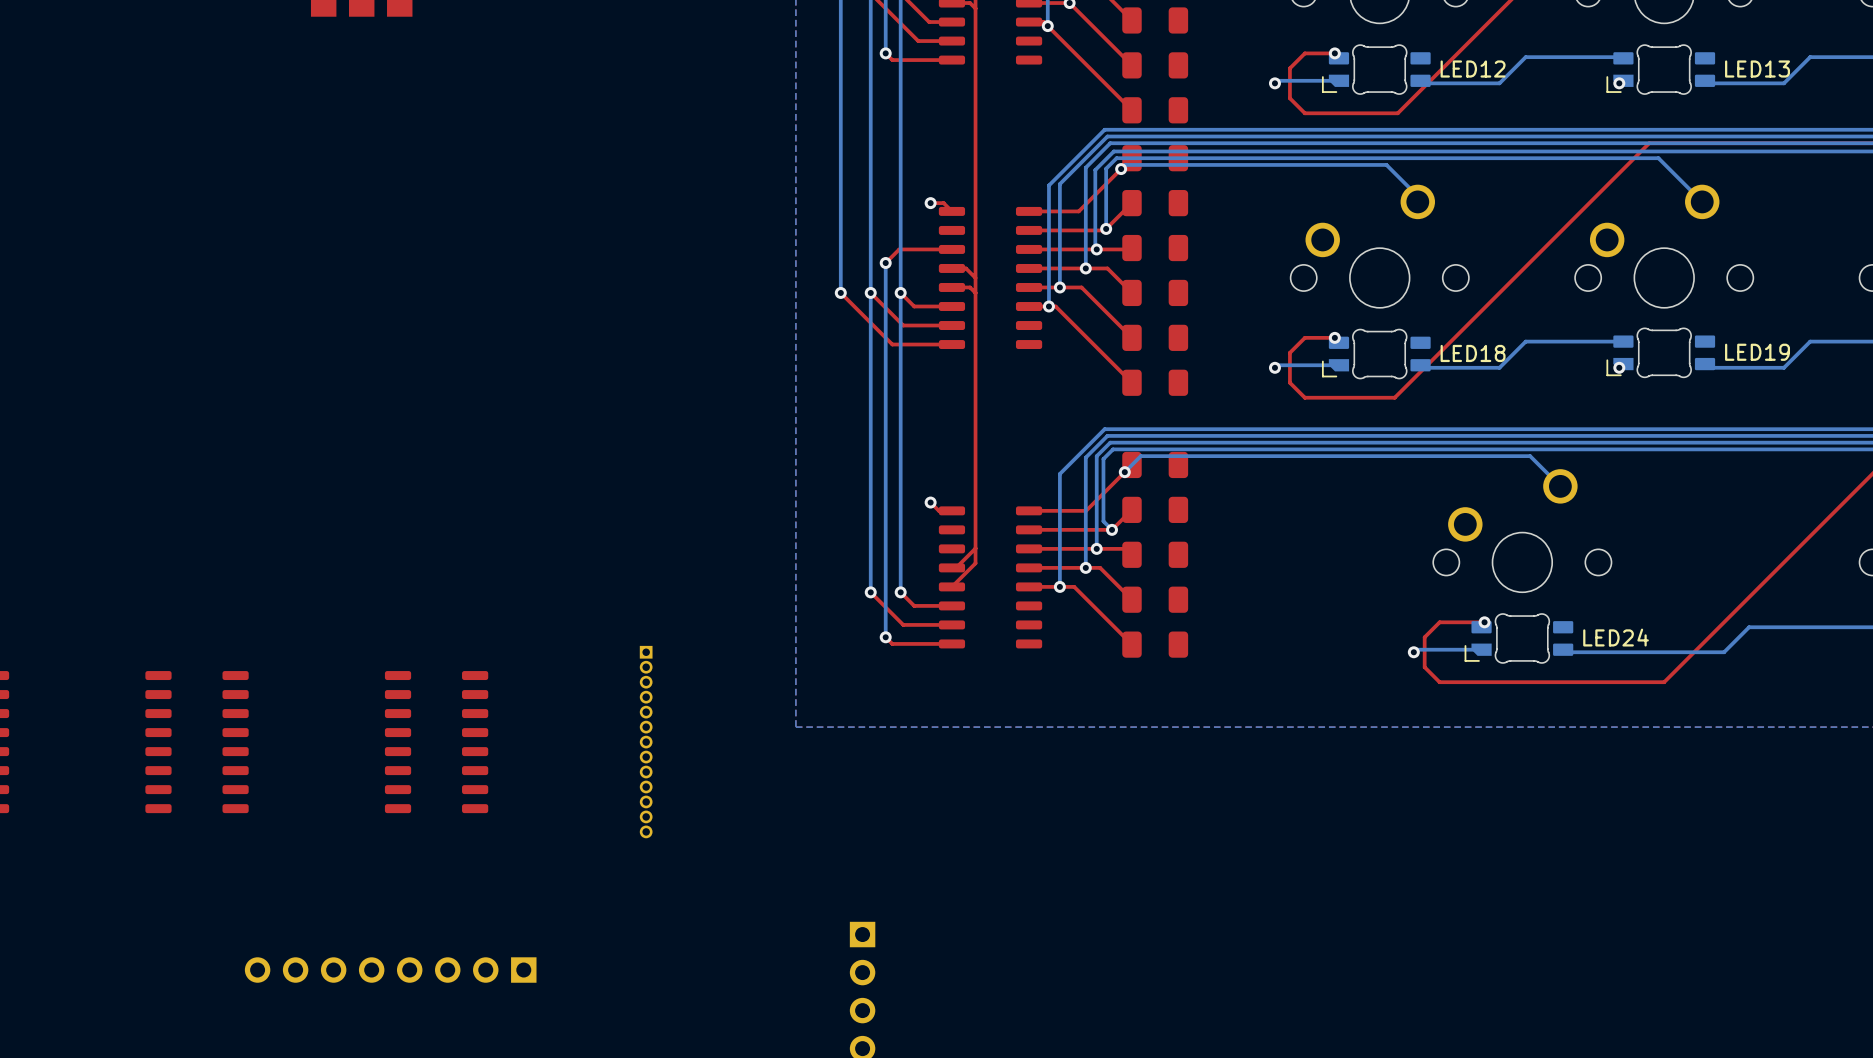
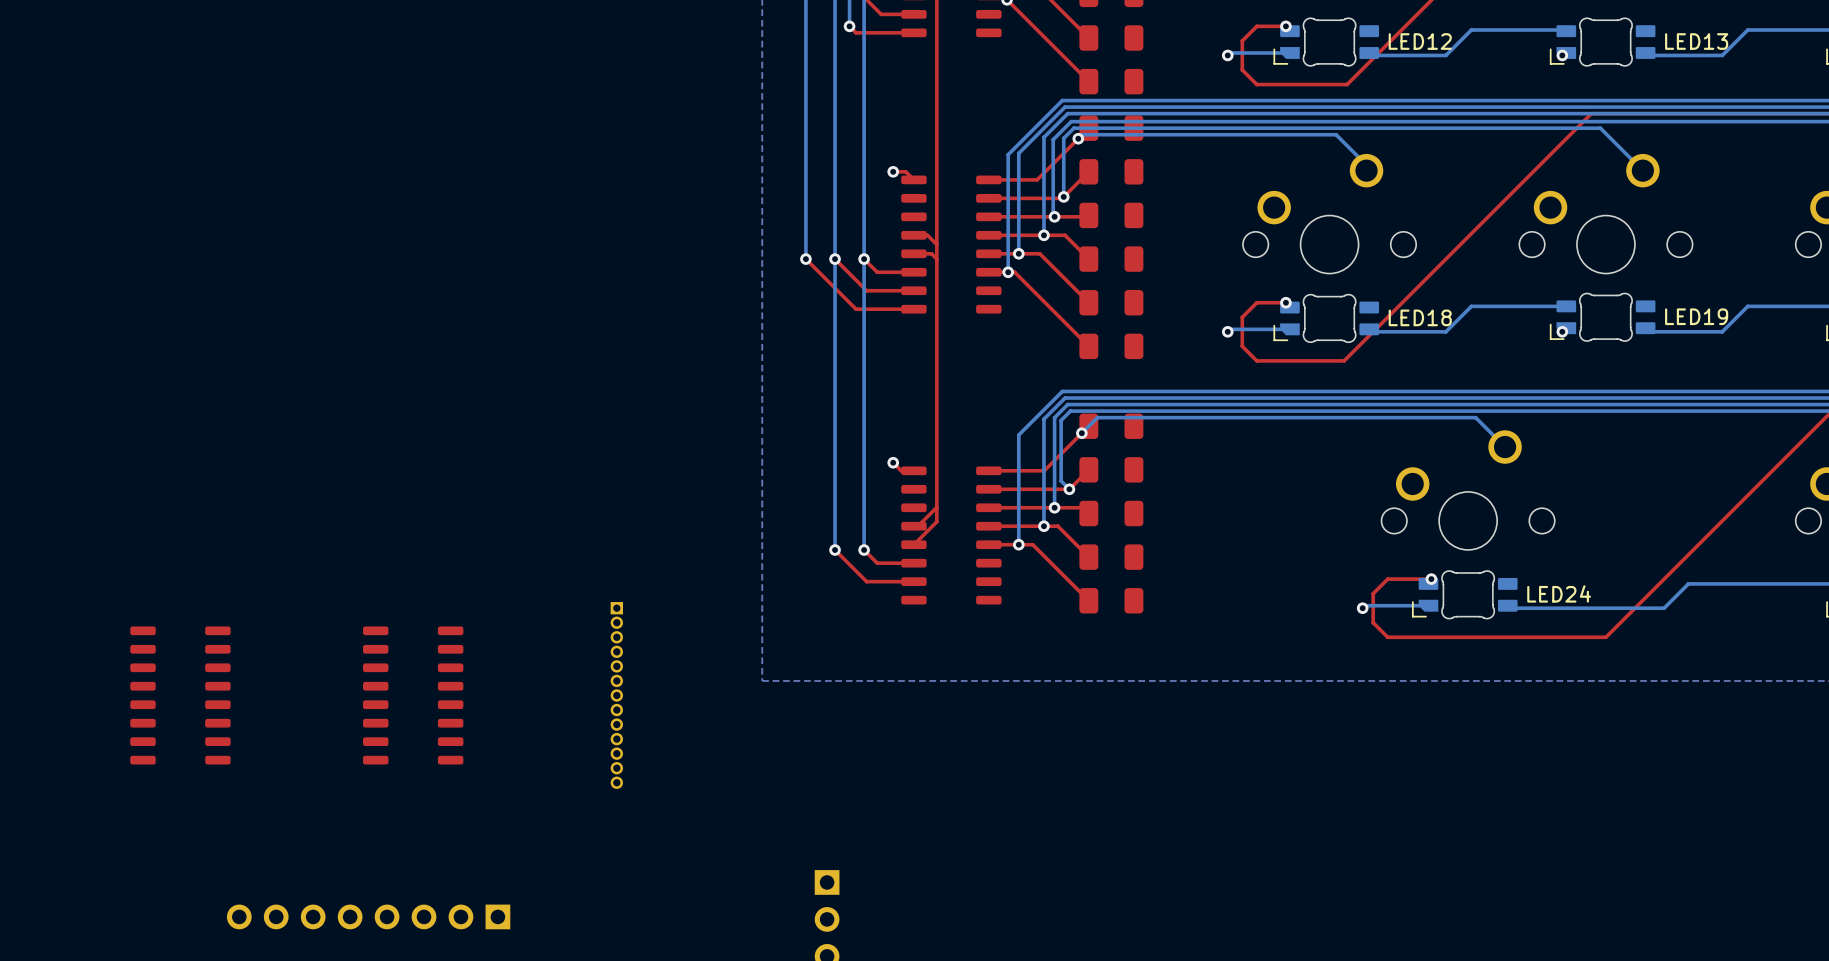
top track: (951, 249) (899, 249) (885, 263) -> none
bottom track: (885, 263) (885, 637) -> none
via: (885, 263) -> none
top track: (885, 637) (892, 643) (951, 643) -> none
via: (885, 637) -> none

